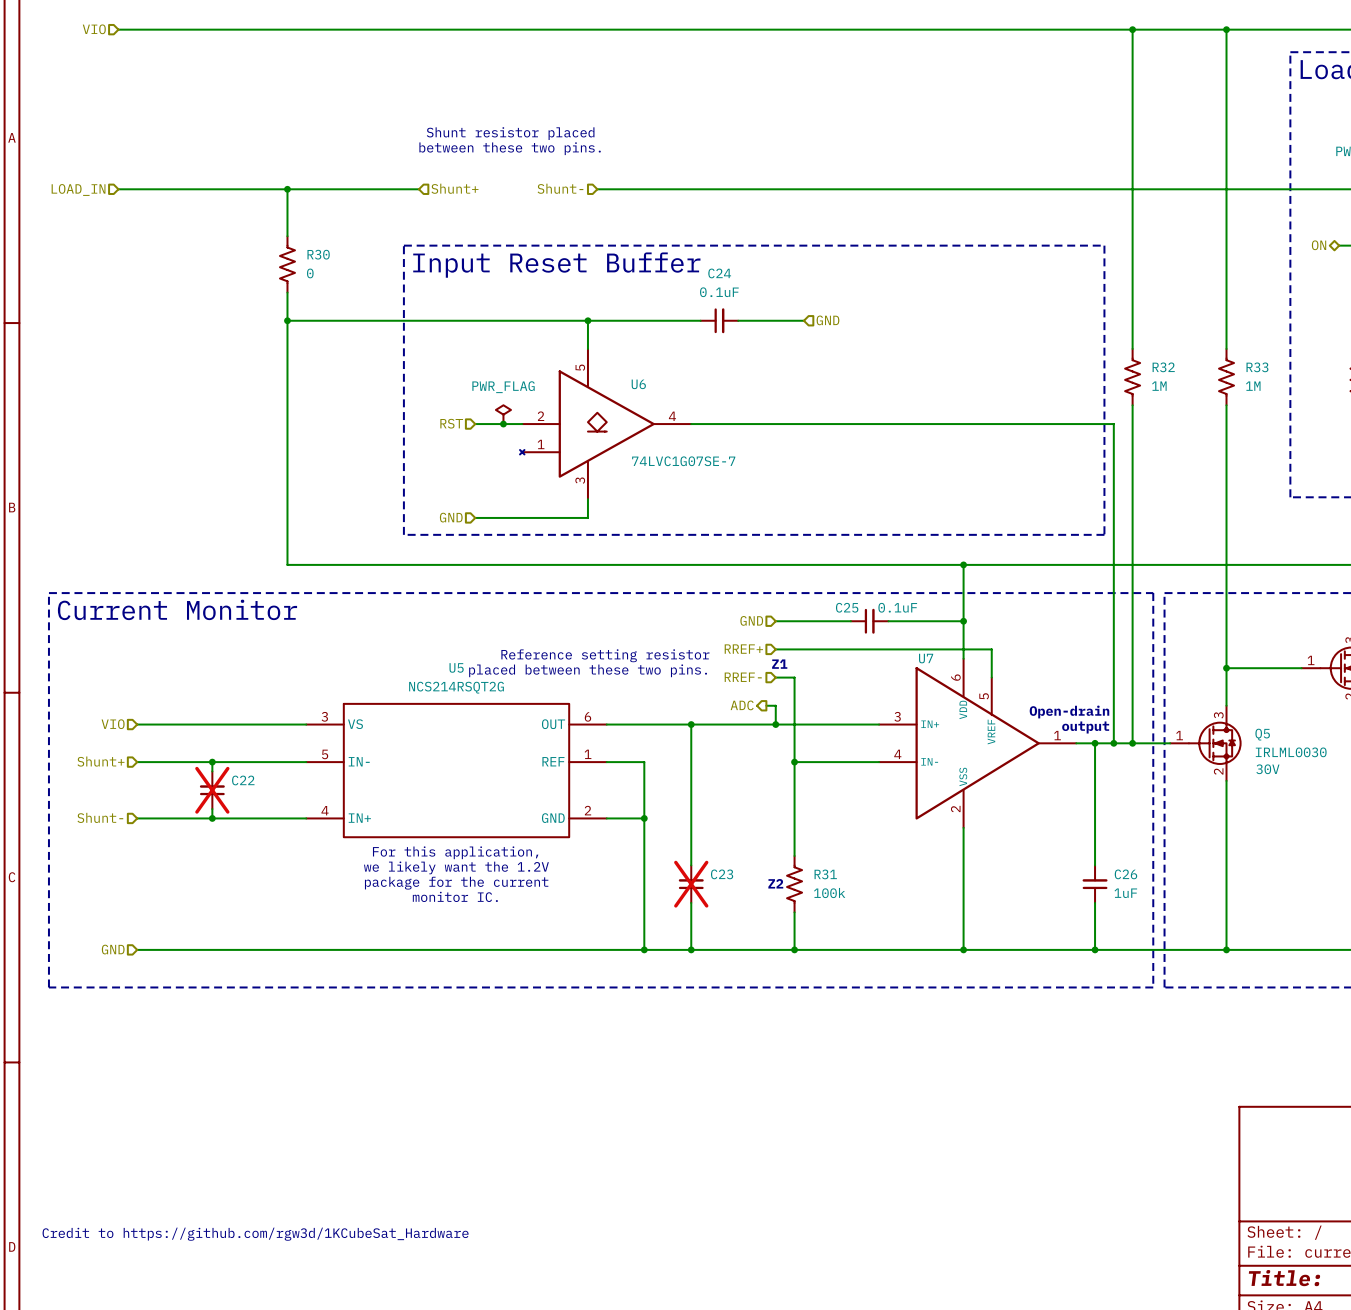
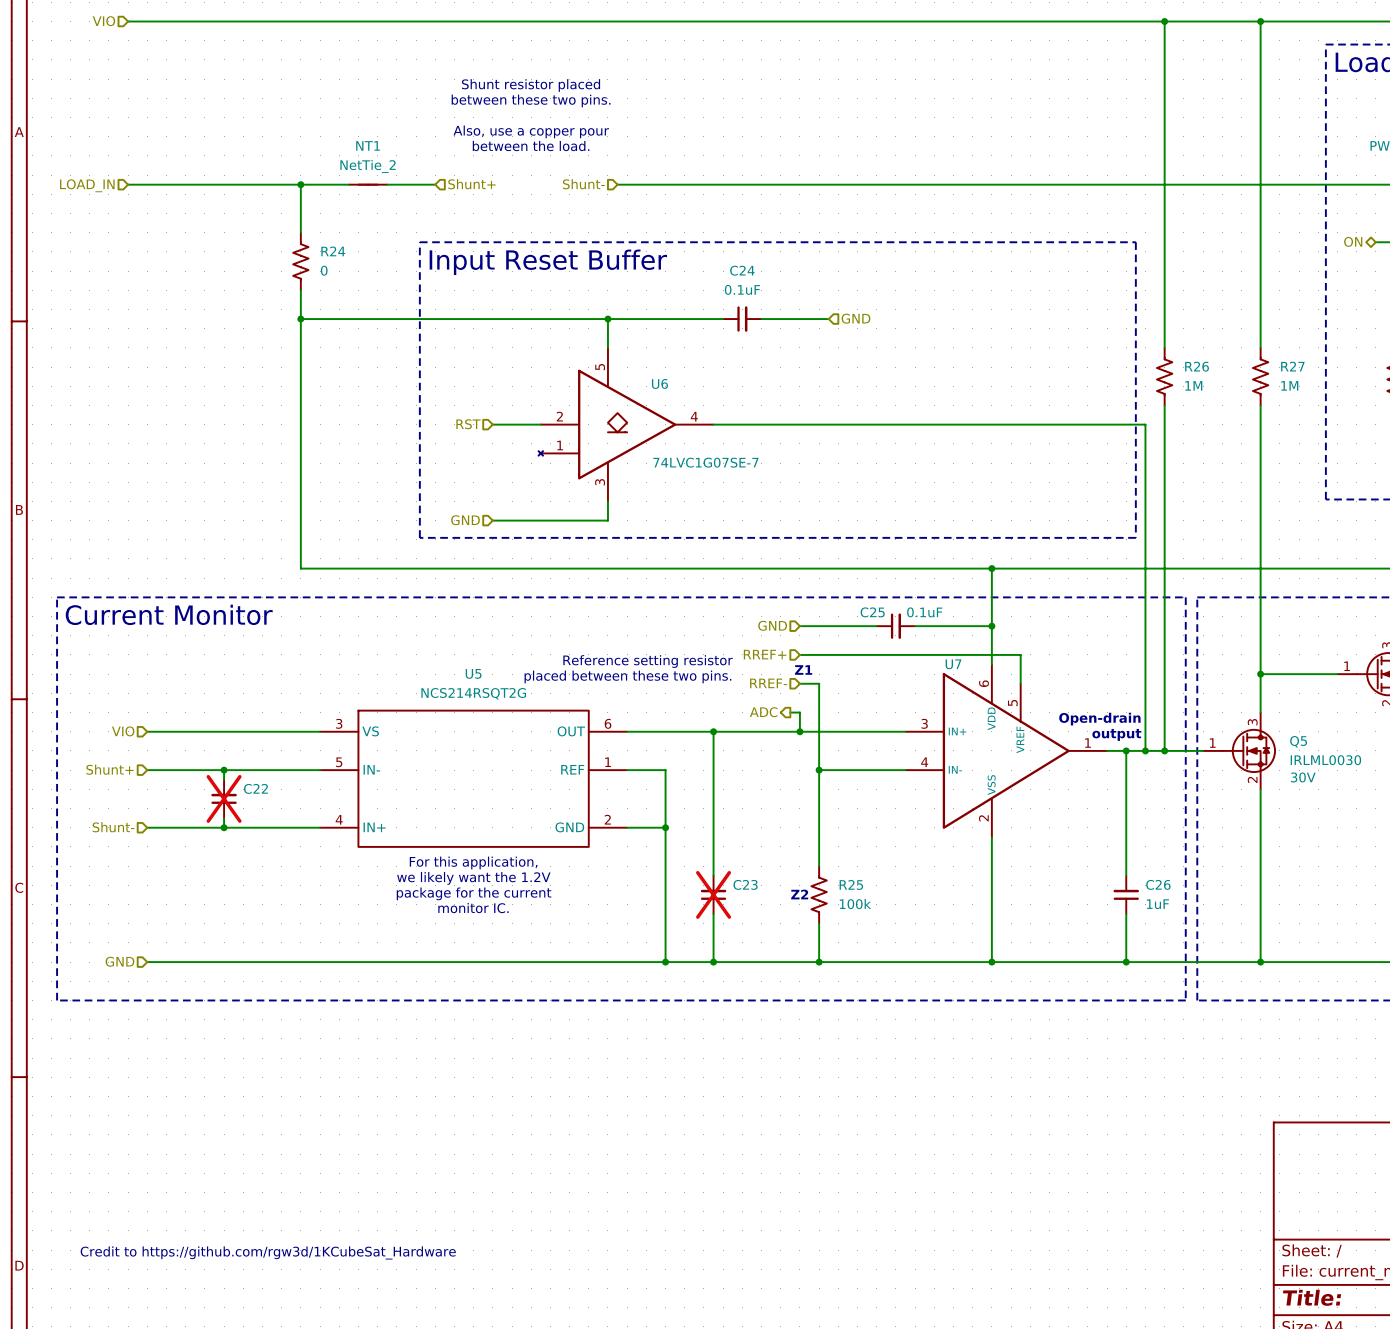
text position: Shunt resistor placed (510, 133) -> Shunt resistor placed (531, 85)
text: none -> Also, use a copper pour (531, 131)
text position: between these two pins. (510, 148) -> between these two pins. (531, 100)
text: none -> between the load. (531, 146)
NT1: none -> NetTie_2 (368, 184)
R30 name: R30 (318, 254) -> R24 (333, 251)
R32 name: R32 (1163, 367) -> R26 (1197, 366)
R33 name: R33 (1257, 367) -> R27 (1292, 366)
power symbol: PWR_FLAG (503, 414) -> none
junction: (503, 424) -> none
R31 name: R31 (825, 874) -> R25 (851, 884)

